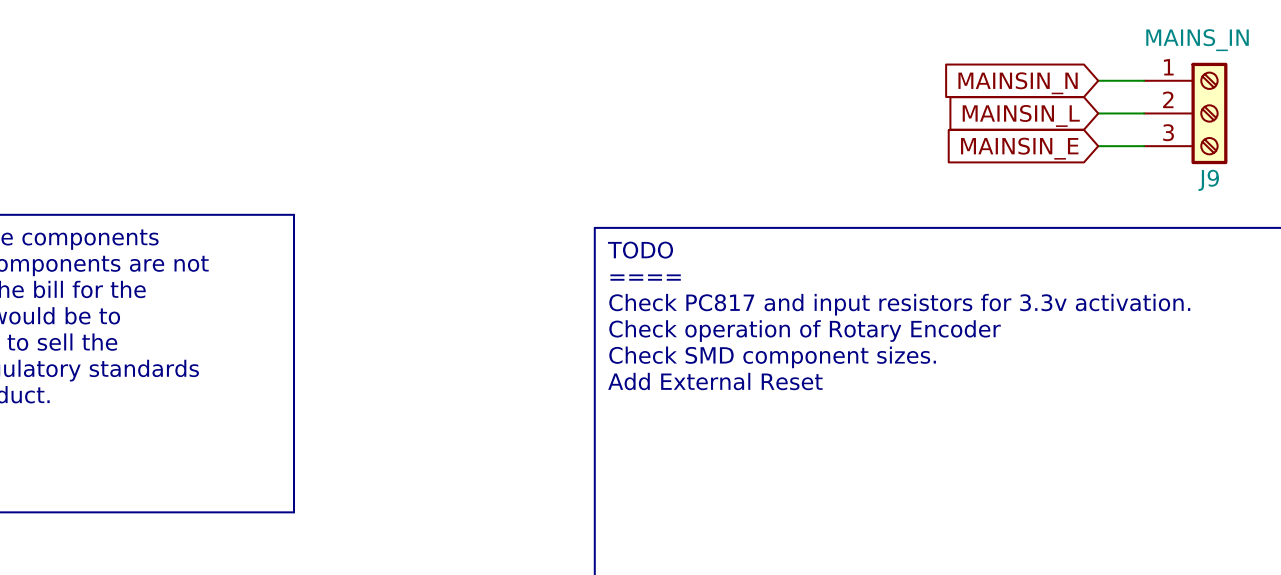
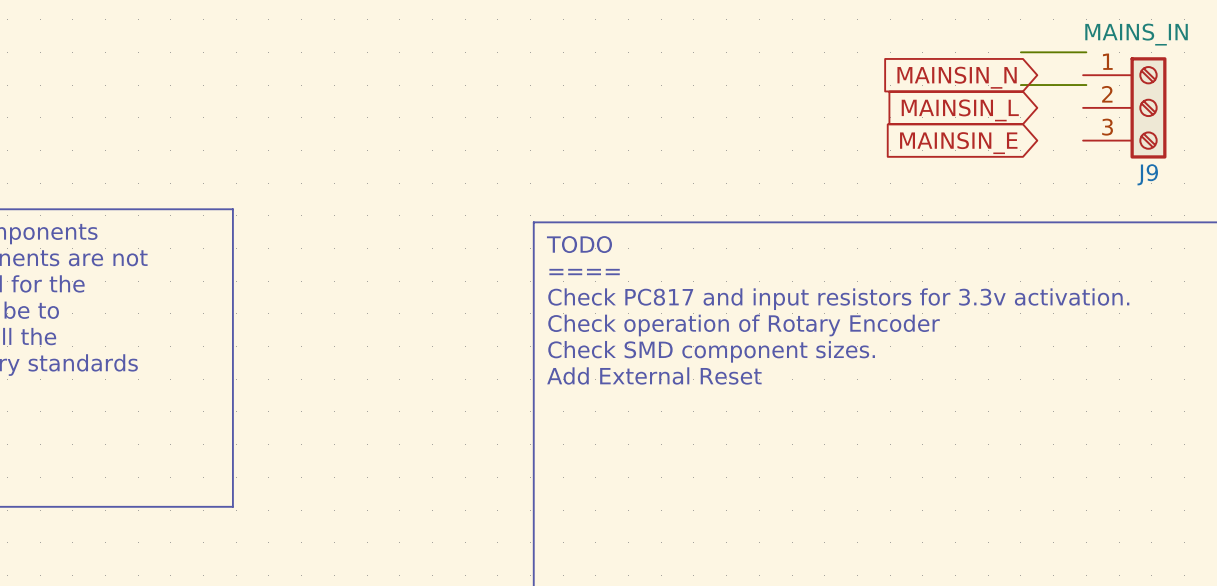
wire: none -> (1020, 52) (1086, 52)
wire: (1098, 80) (1144, 80) -> none
wire: none -> (1020, 85) (1086, 85)
wire: (1098, 113) (1144, 113) -> none
wire: (1098, 146) (1144, 146) -> none

